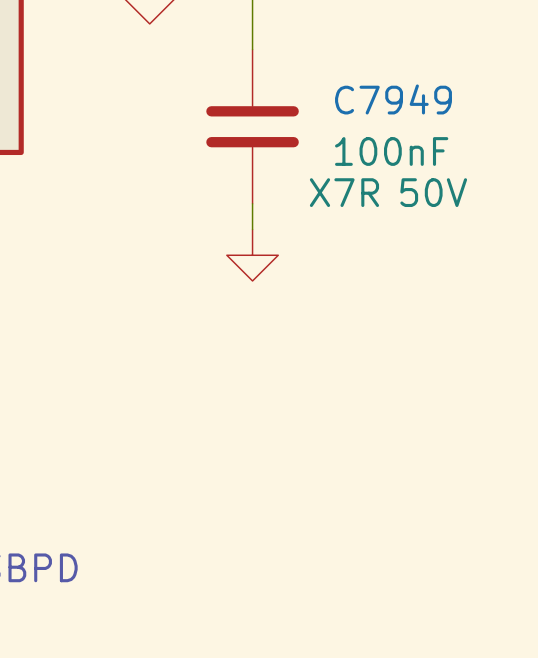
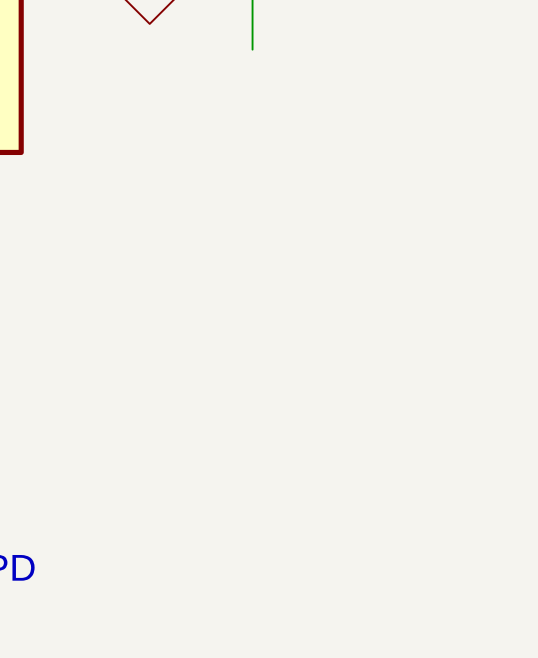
C7949: 100nF (252, 126) -> none
wire: (252, 203) (252, 229) -> none
power symbol: (252, 255) -> none

